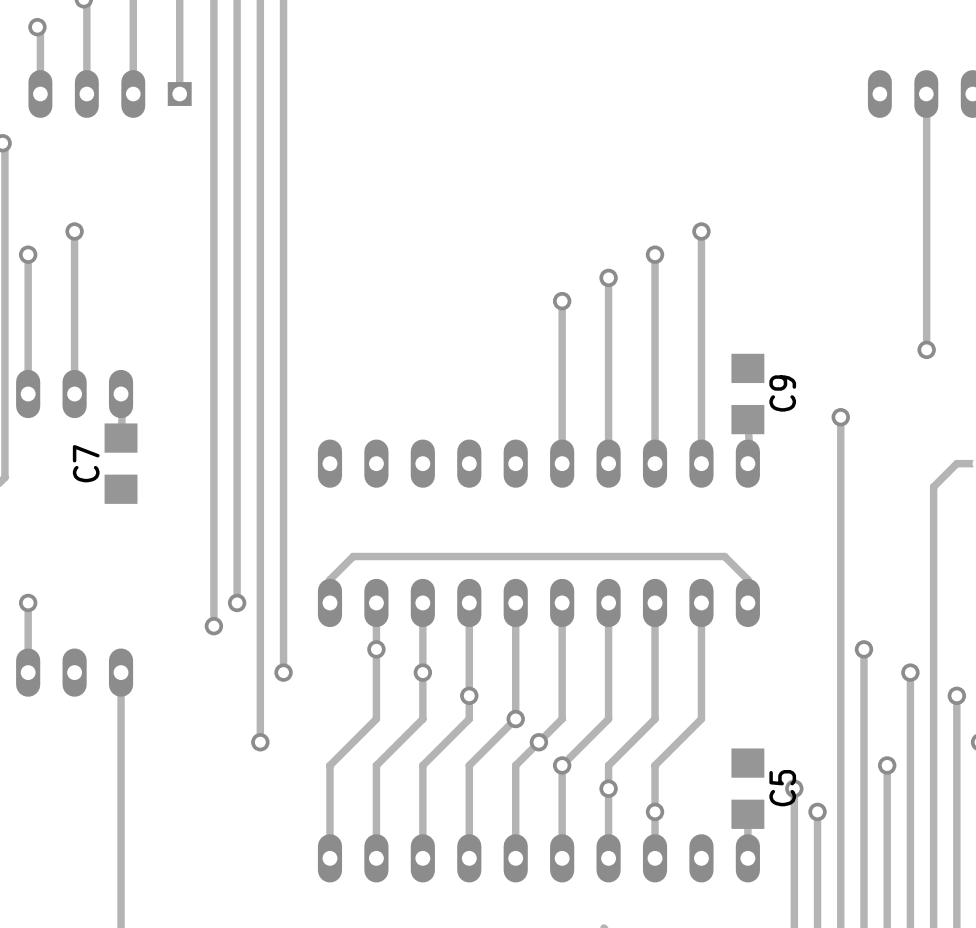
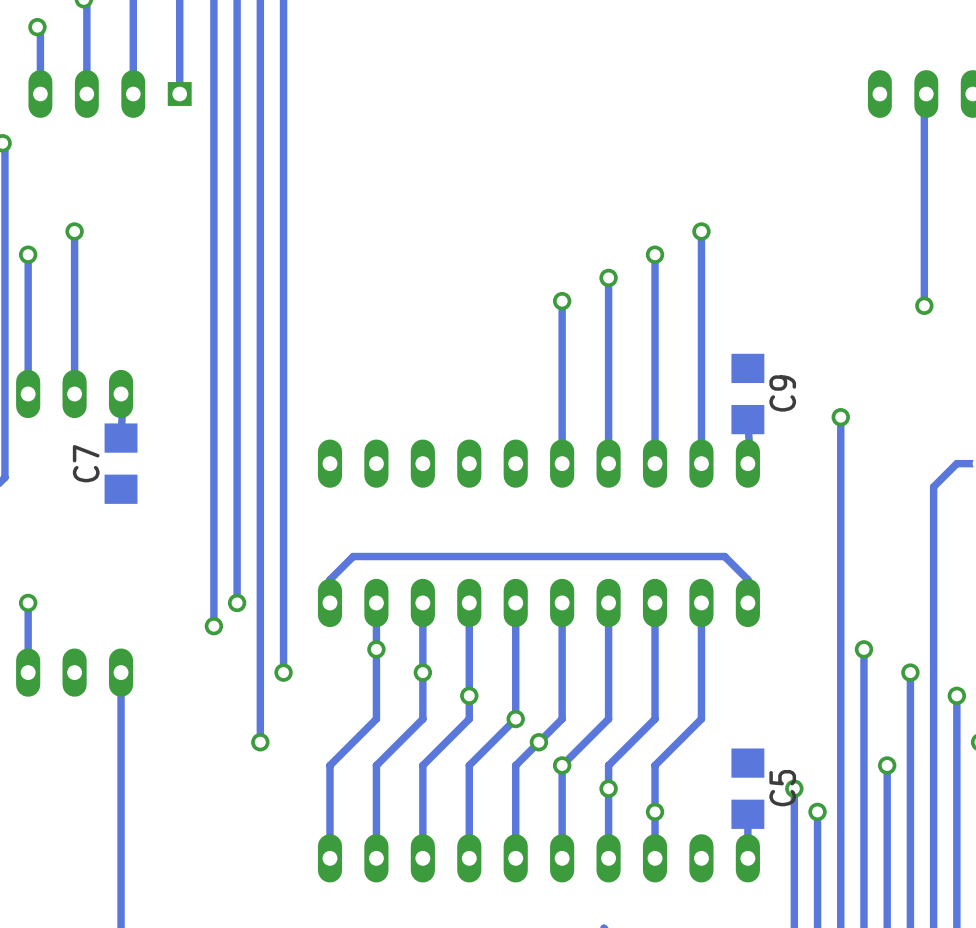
track: (926, 94) (926, 349) -> (926, 94) (924, 94) (924, 305)
via position: (926, 349) -> (924, 305)

